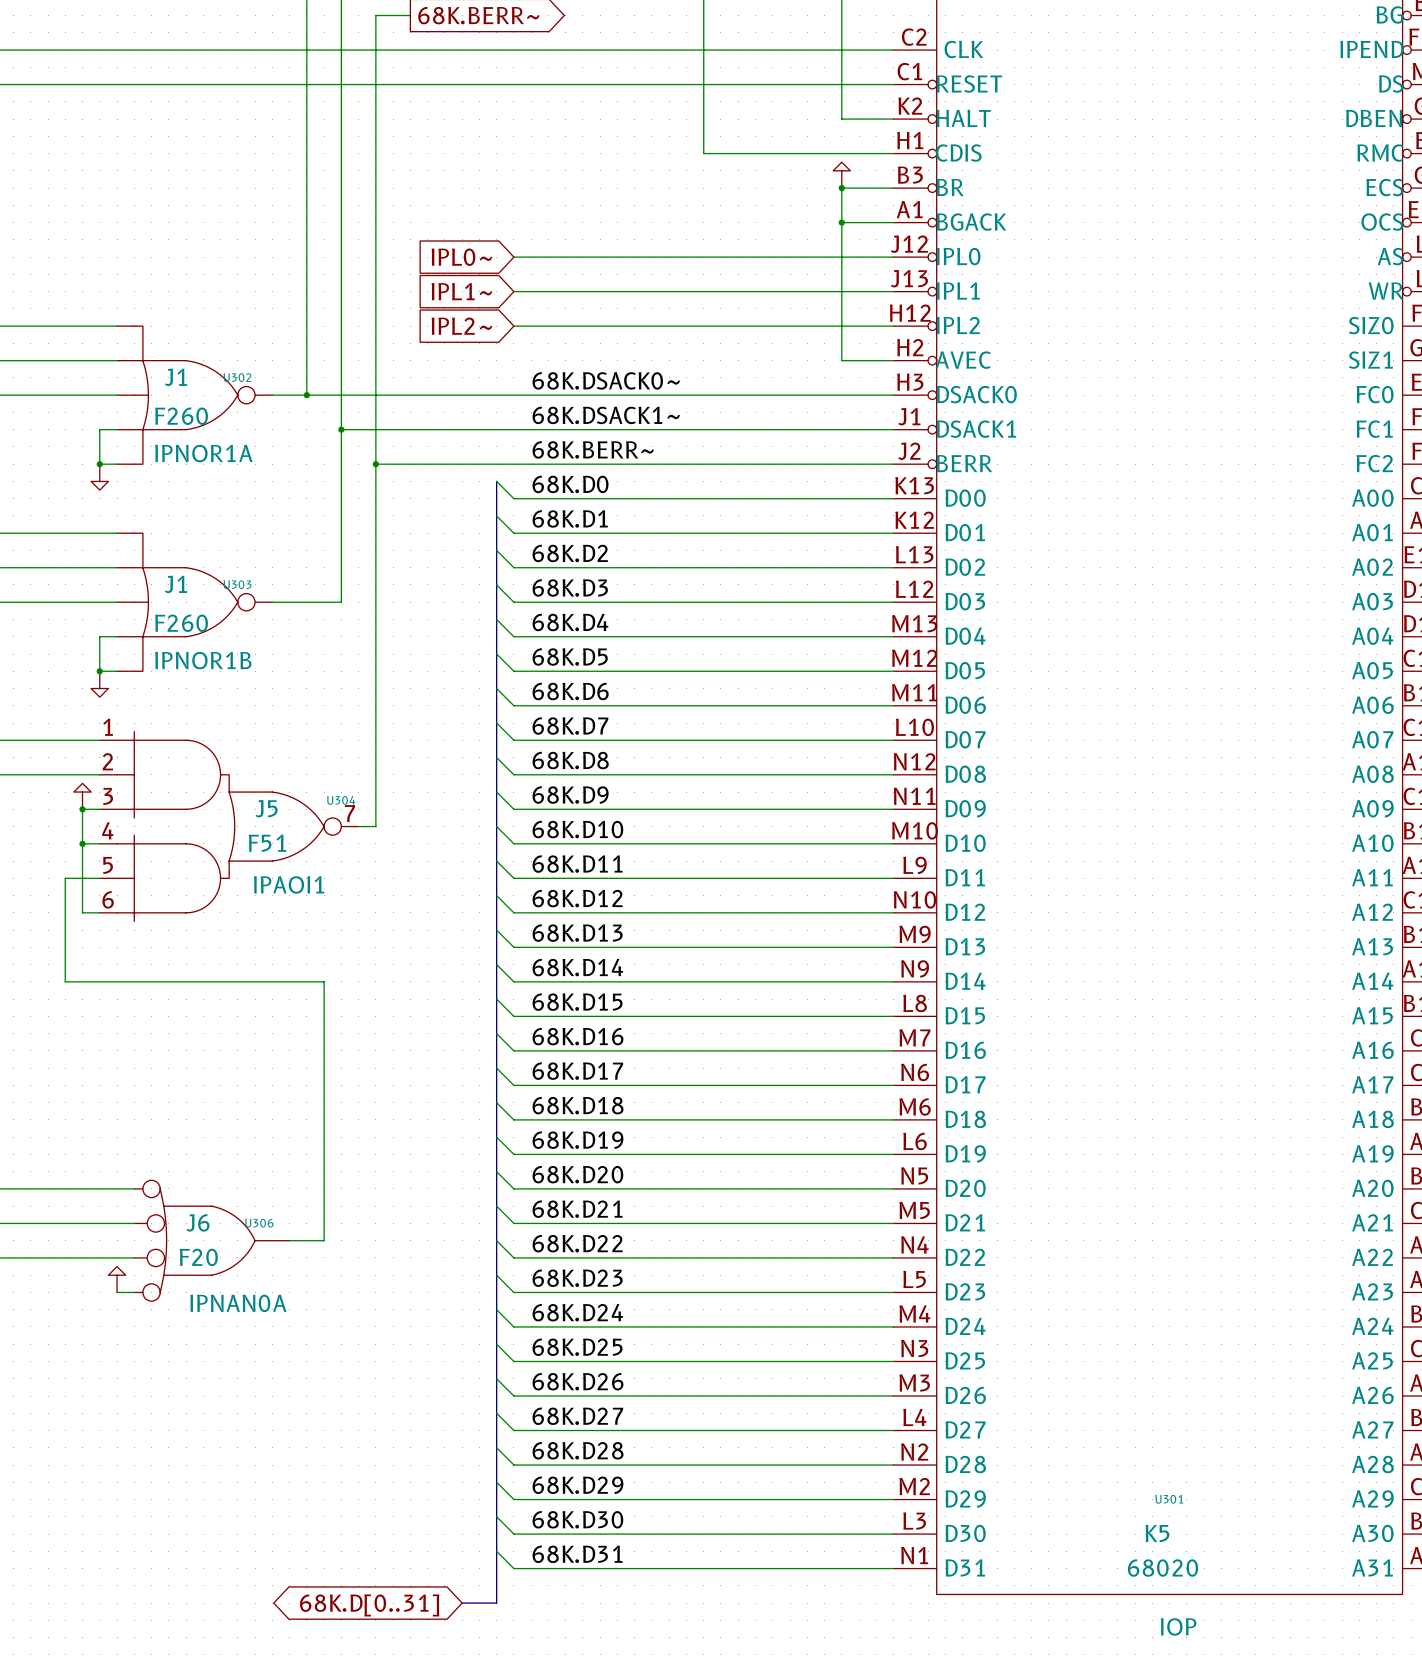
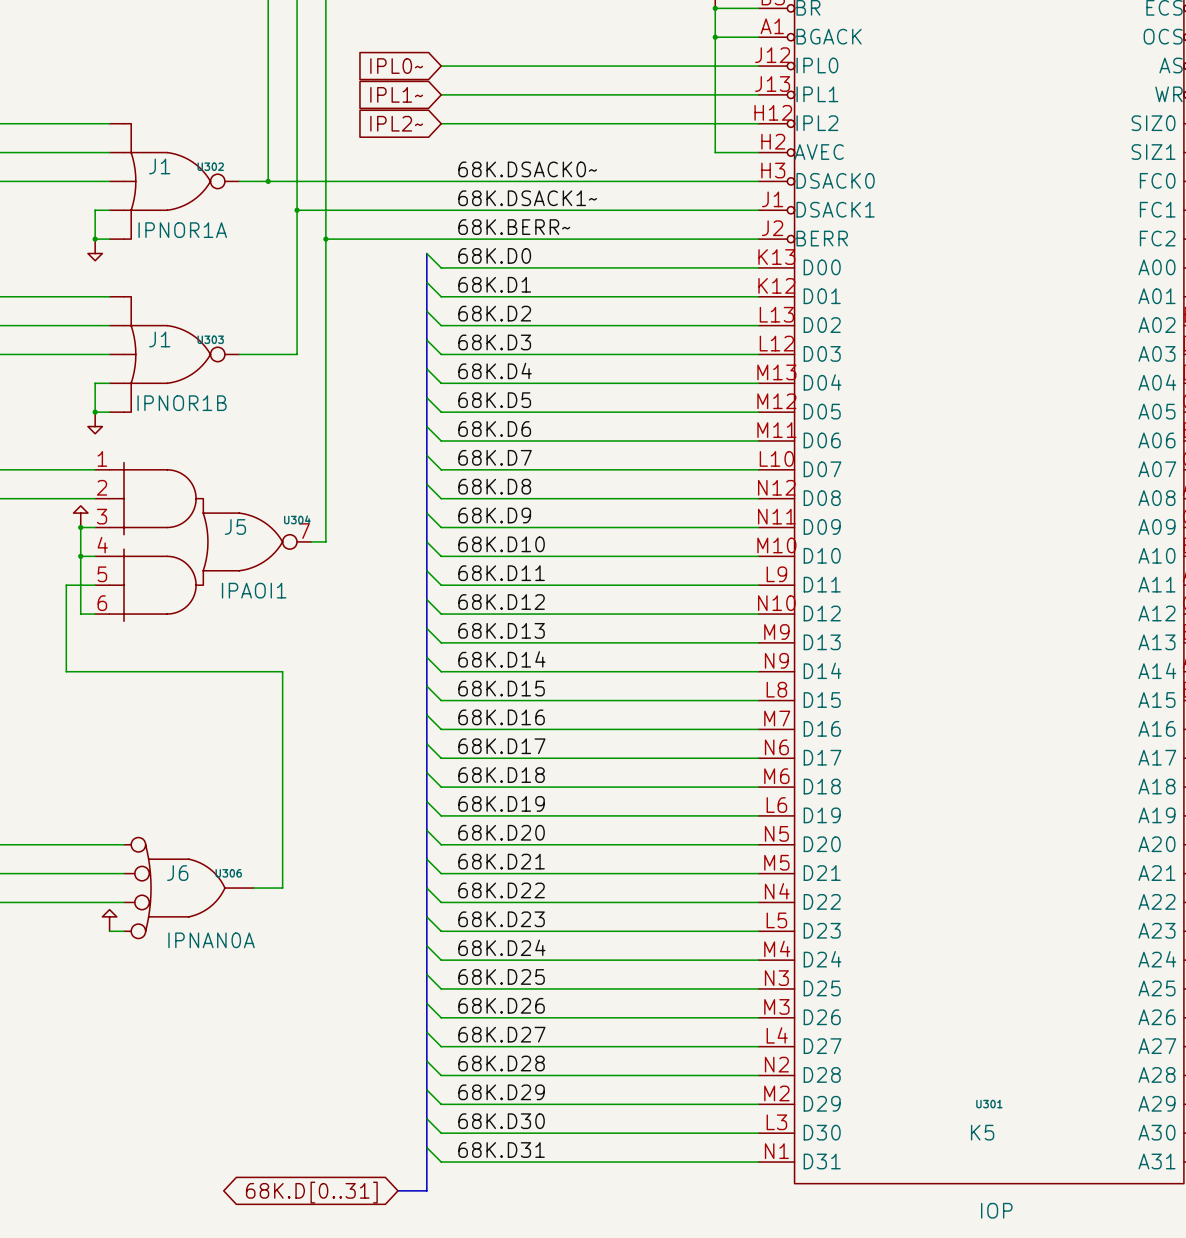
U302 value: F260 (181, 416) -> none
U303 value: F260 (181, 623) -> none
U304 value: F51 (267, 843) -> none
U306 value: F20 (198, 1257) -> none
U301 value: 68020 (1163, 1568) -> none

